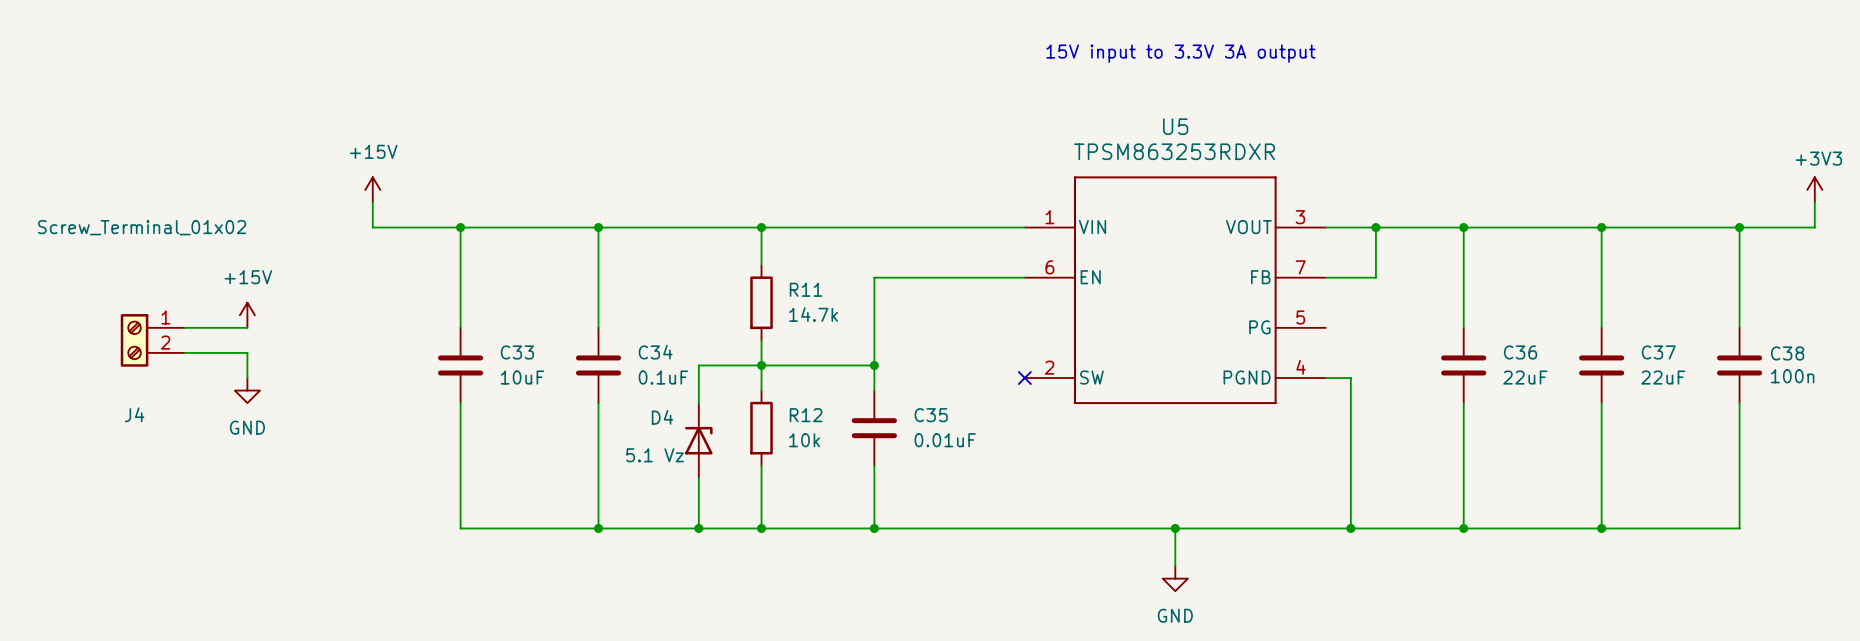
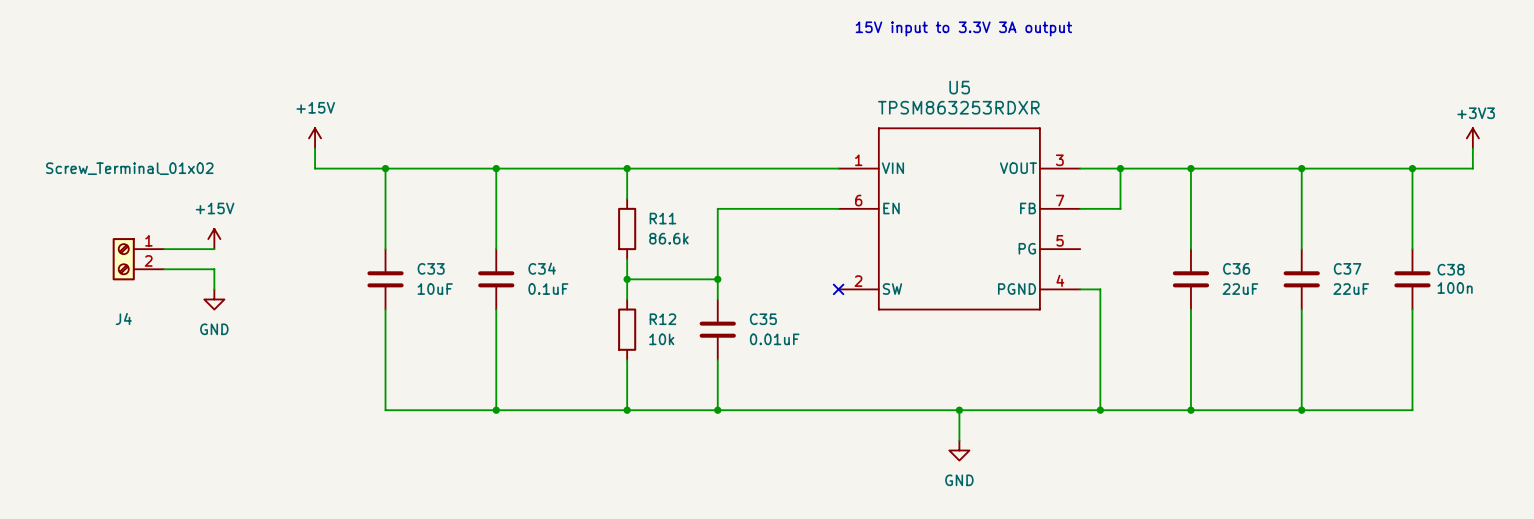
R11 value: 14.7k (813, 314) -> 86.6k (668, 238)
wire: (761, 365) (698, 365) (698, 403) -> none
D4: 5.1 Vz (698, 440) -> none
wire: (698, 478) (698, 528) -> none
junction: (698, 528) -> none

